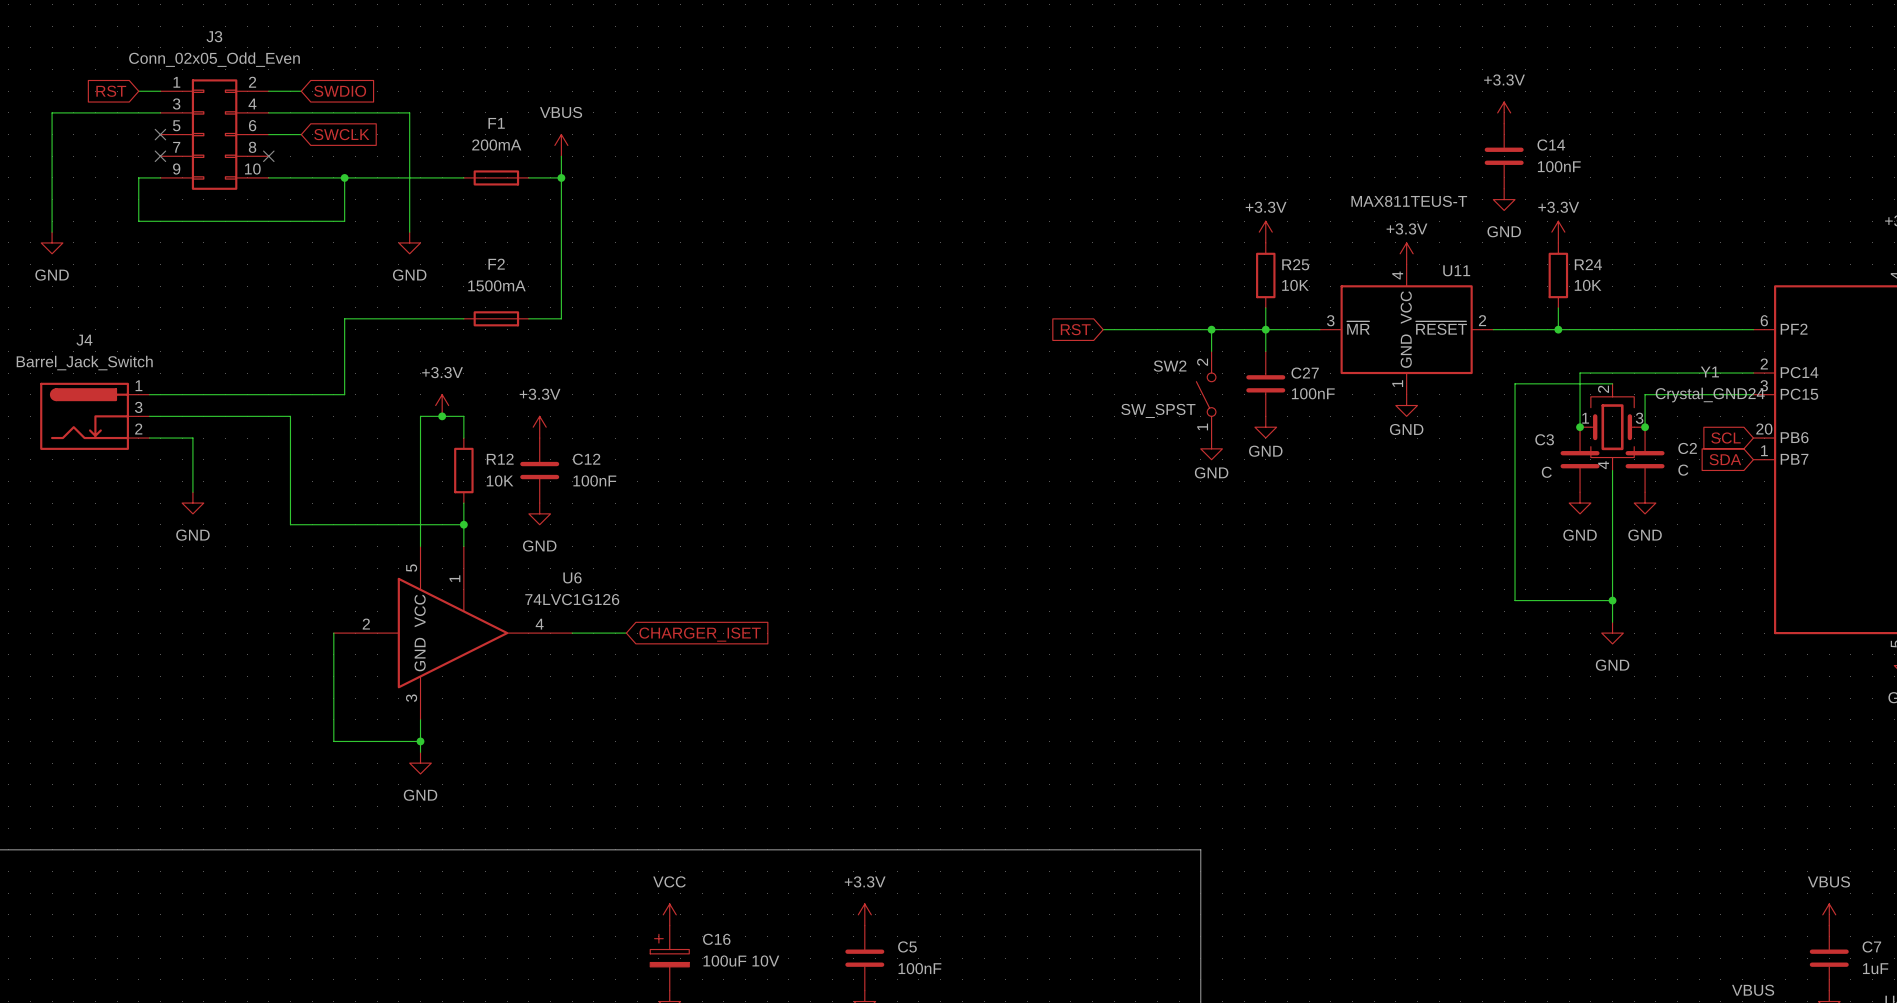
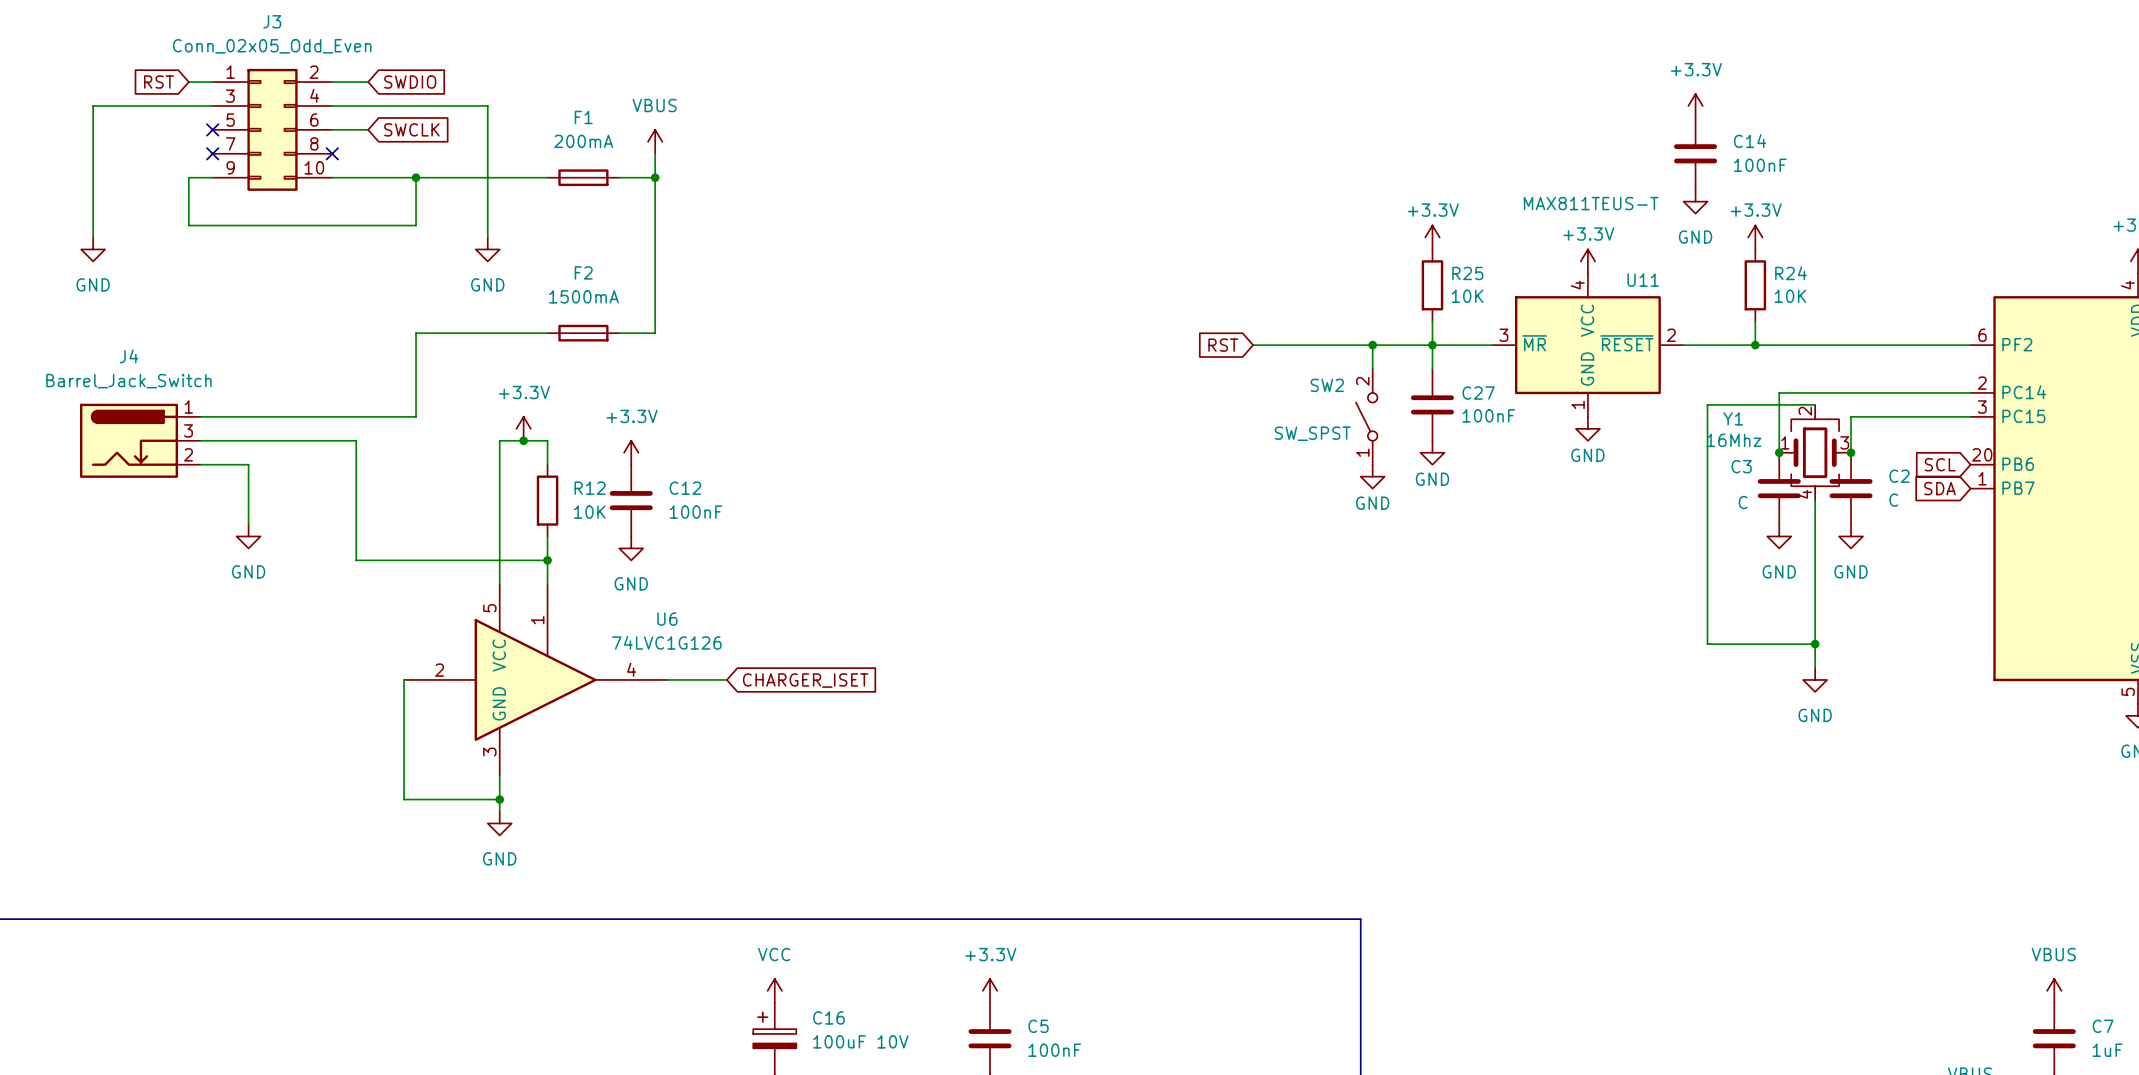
Y1 name position: Y1 (1709, 372) -> Y1 (1733, 418)
Y1 value: Crystal_GND24 (1710, 395) -> 16Mhz (1734, 440)

